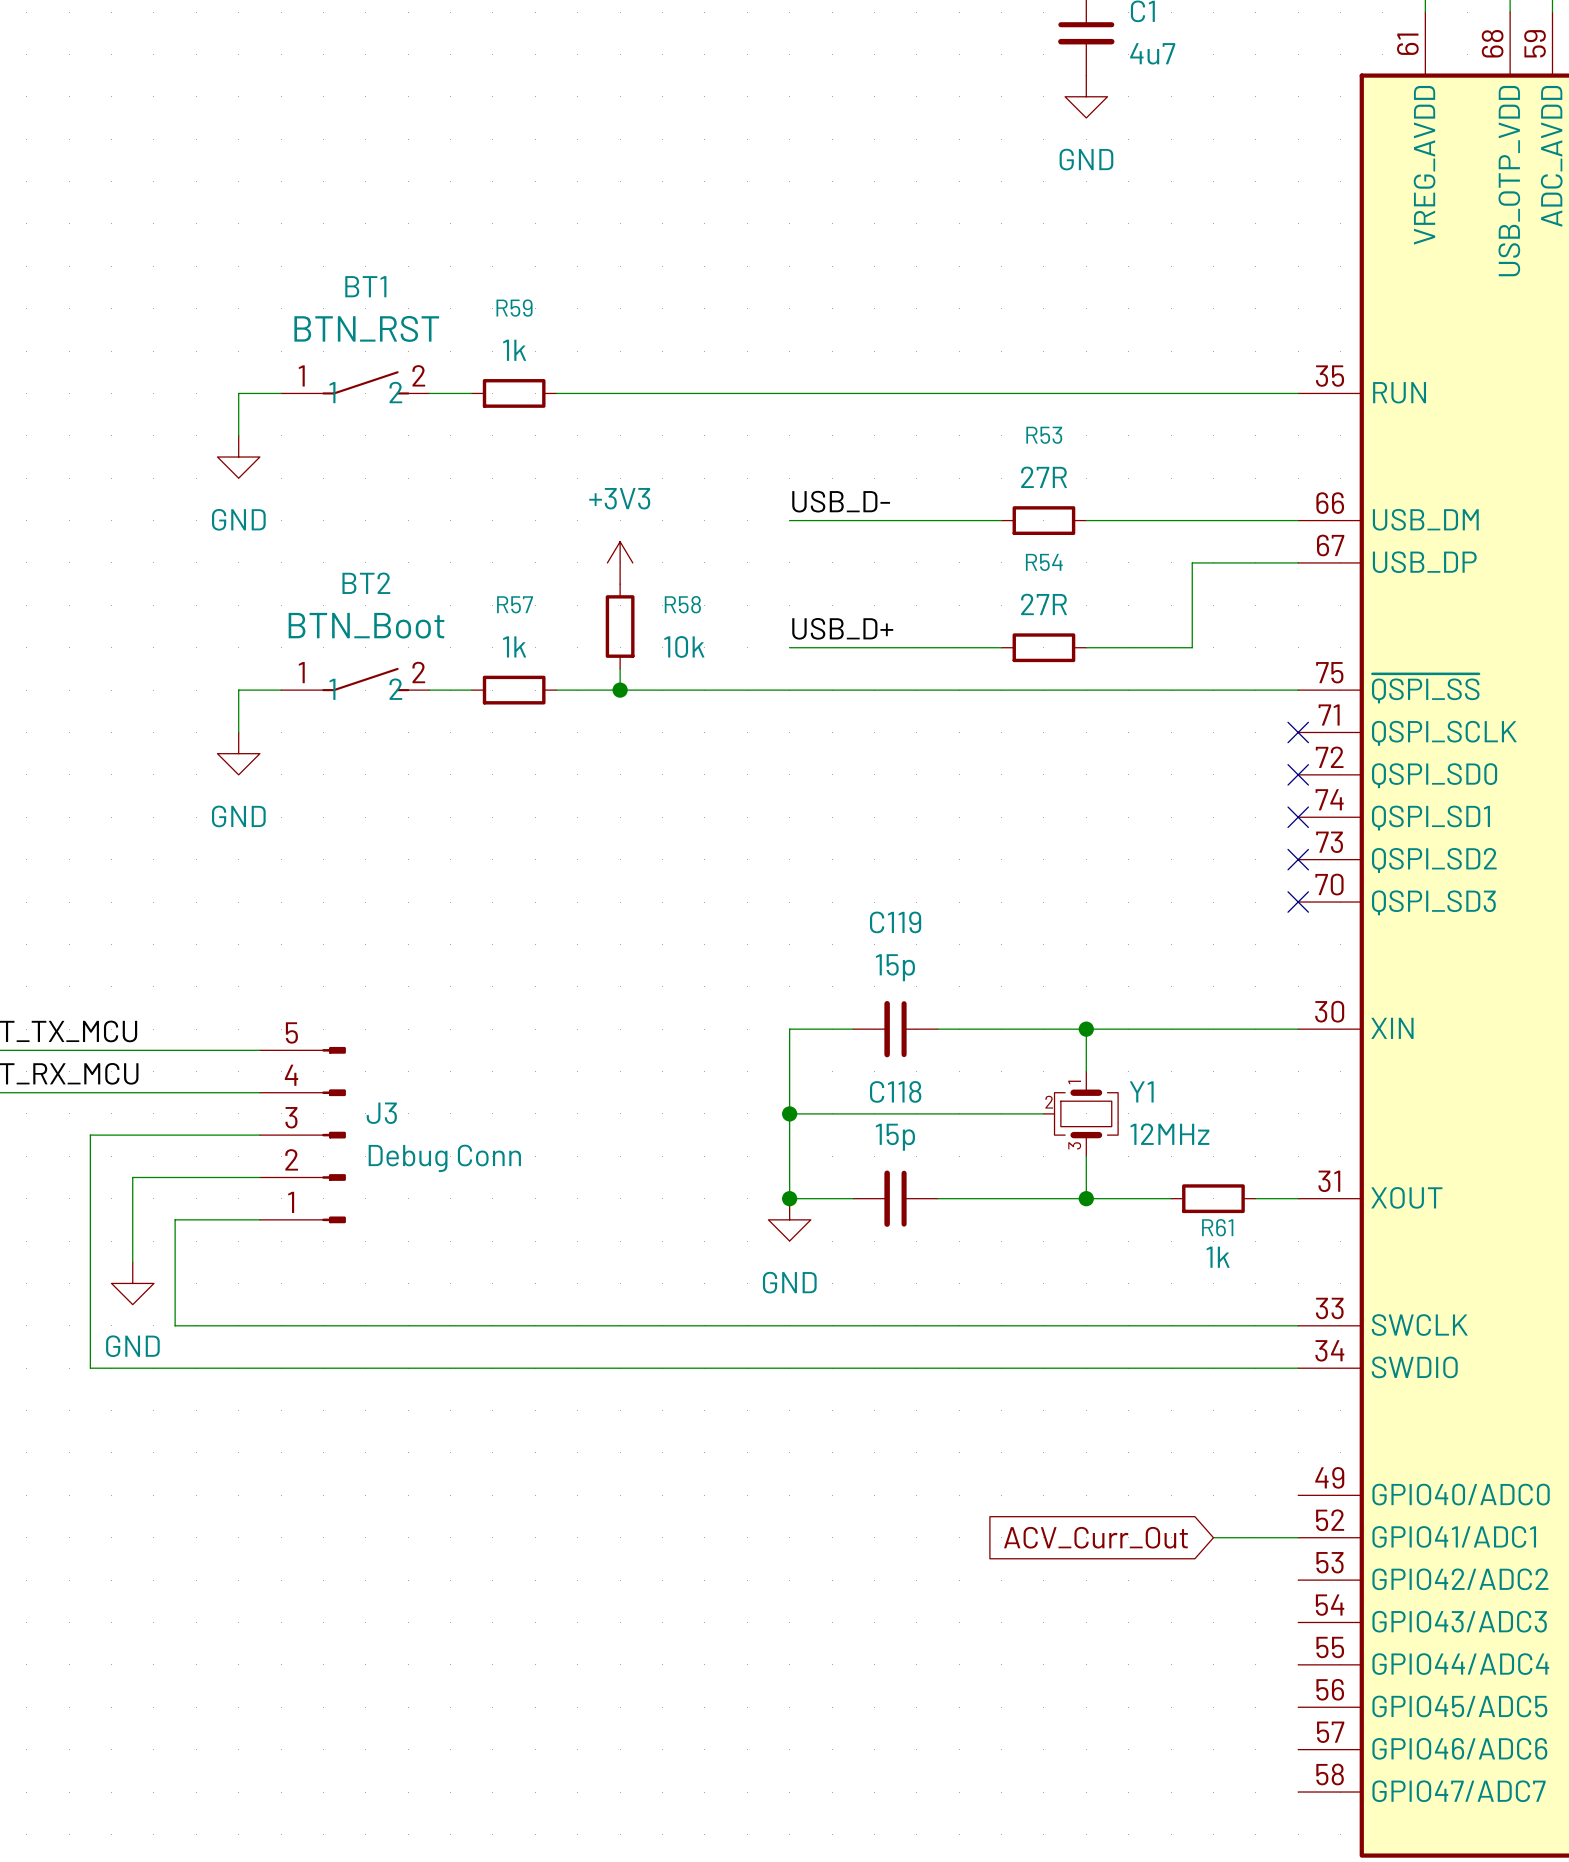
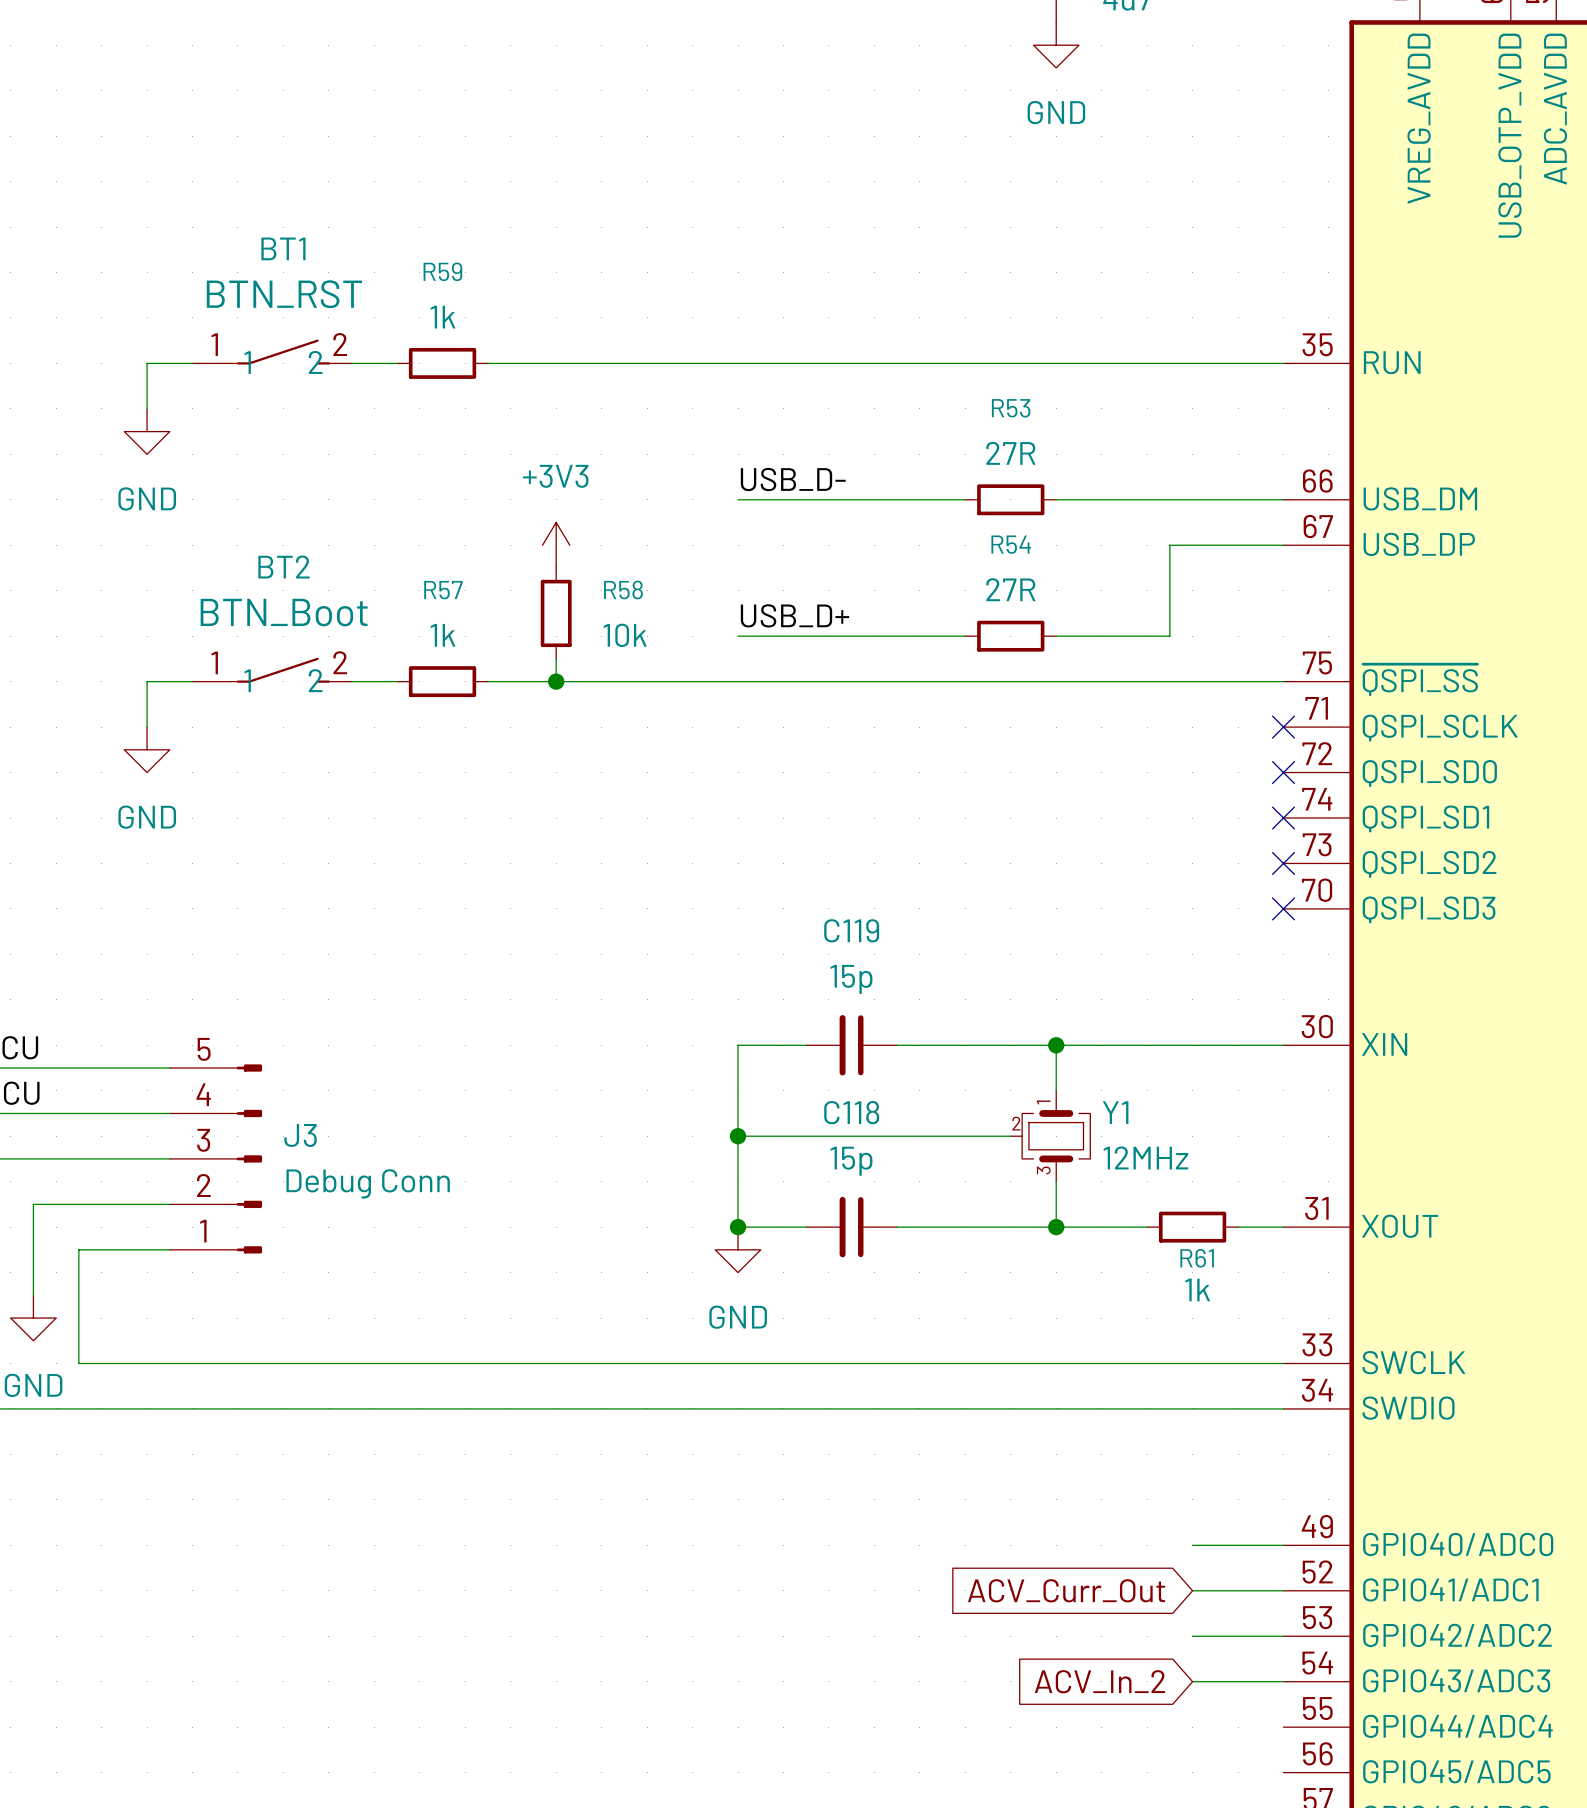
wire: none -> (1192, 1545) (1283, 1545)
wire: none -> (1192, 1636) (1283, 1636)
global label: none -> ACV_In_2 (1099, 1681)
wire: none -> (1192, 1681) (1283, 1681)

